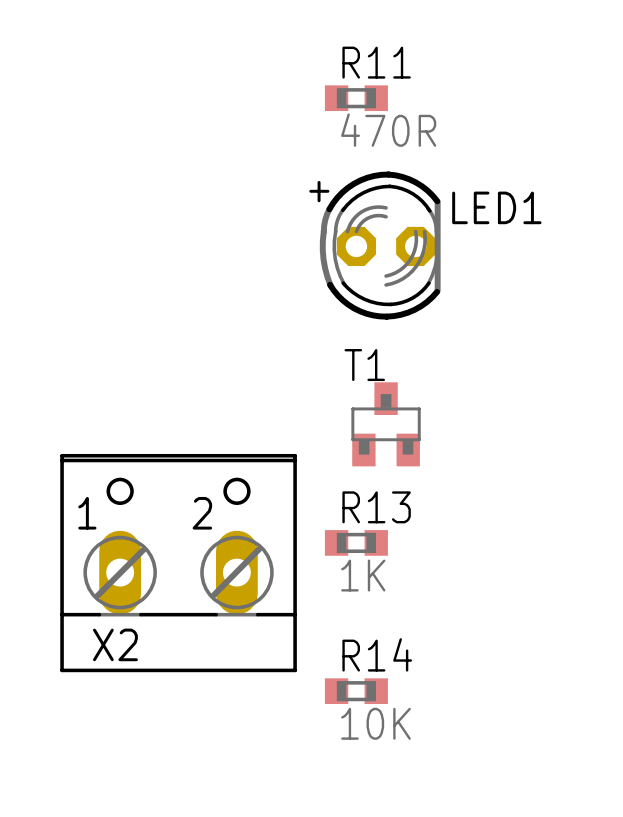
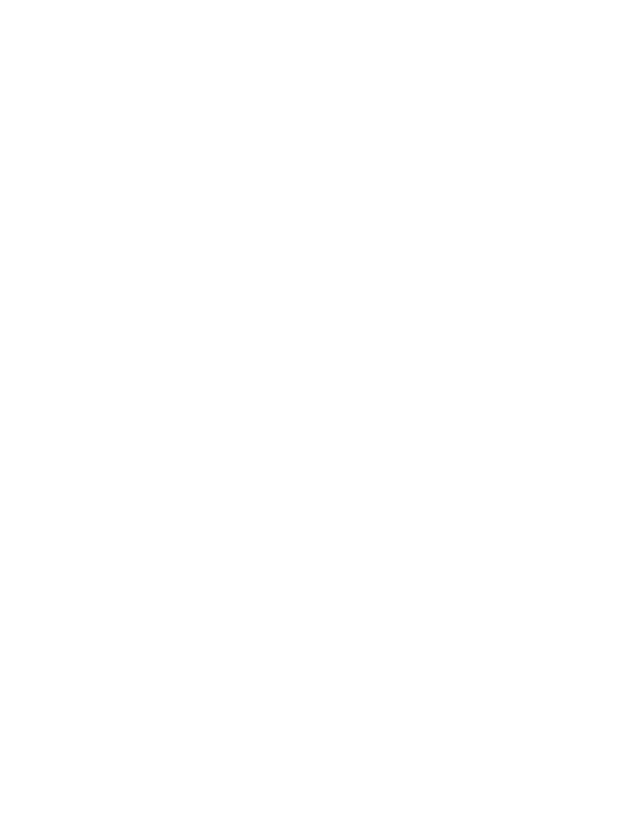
R11: 470R (356, 98) -> none
LED1: (374, 245) -> none
T1: (386, 424) -> none
R13: 1K (356, 542) -> none
X2: (178, 563) -> none
R14: 10K (356, 691) -> none

